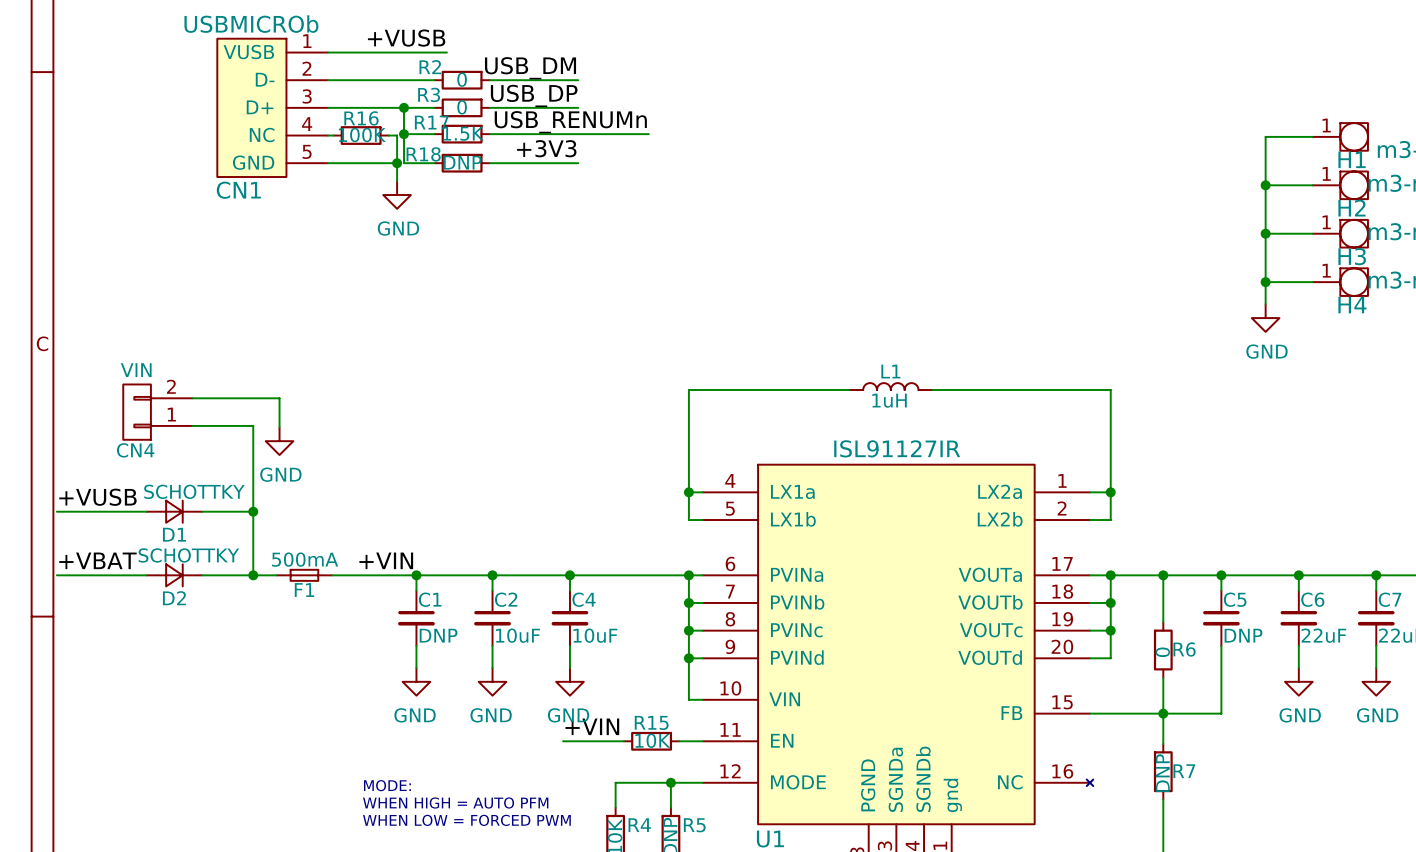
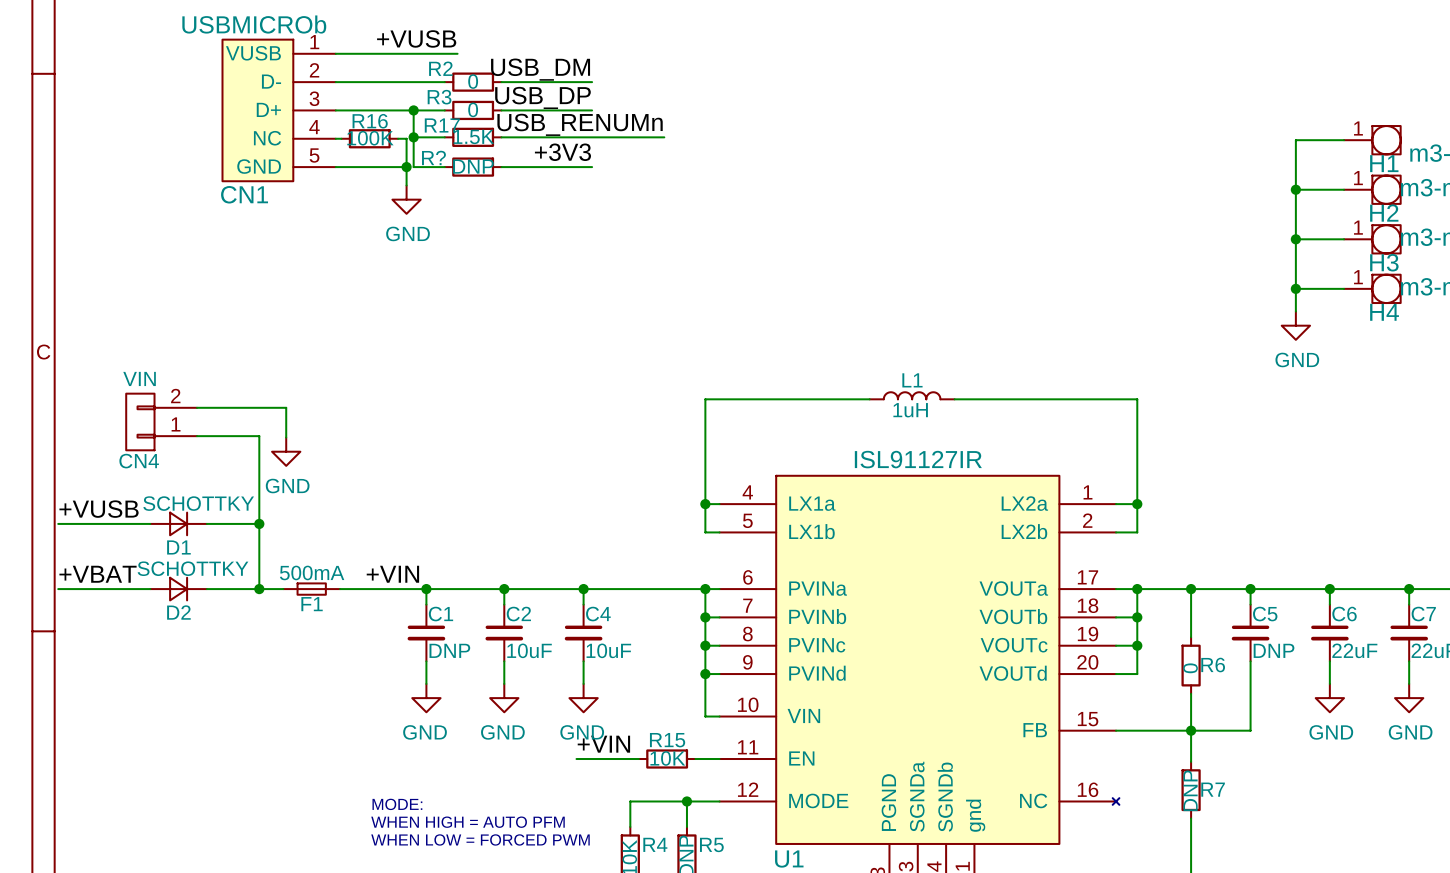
R18 name: R18 (423, 154) -> R? (433, 157)

